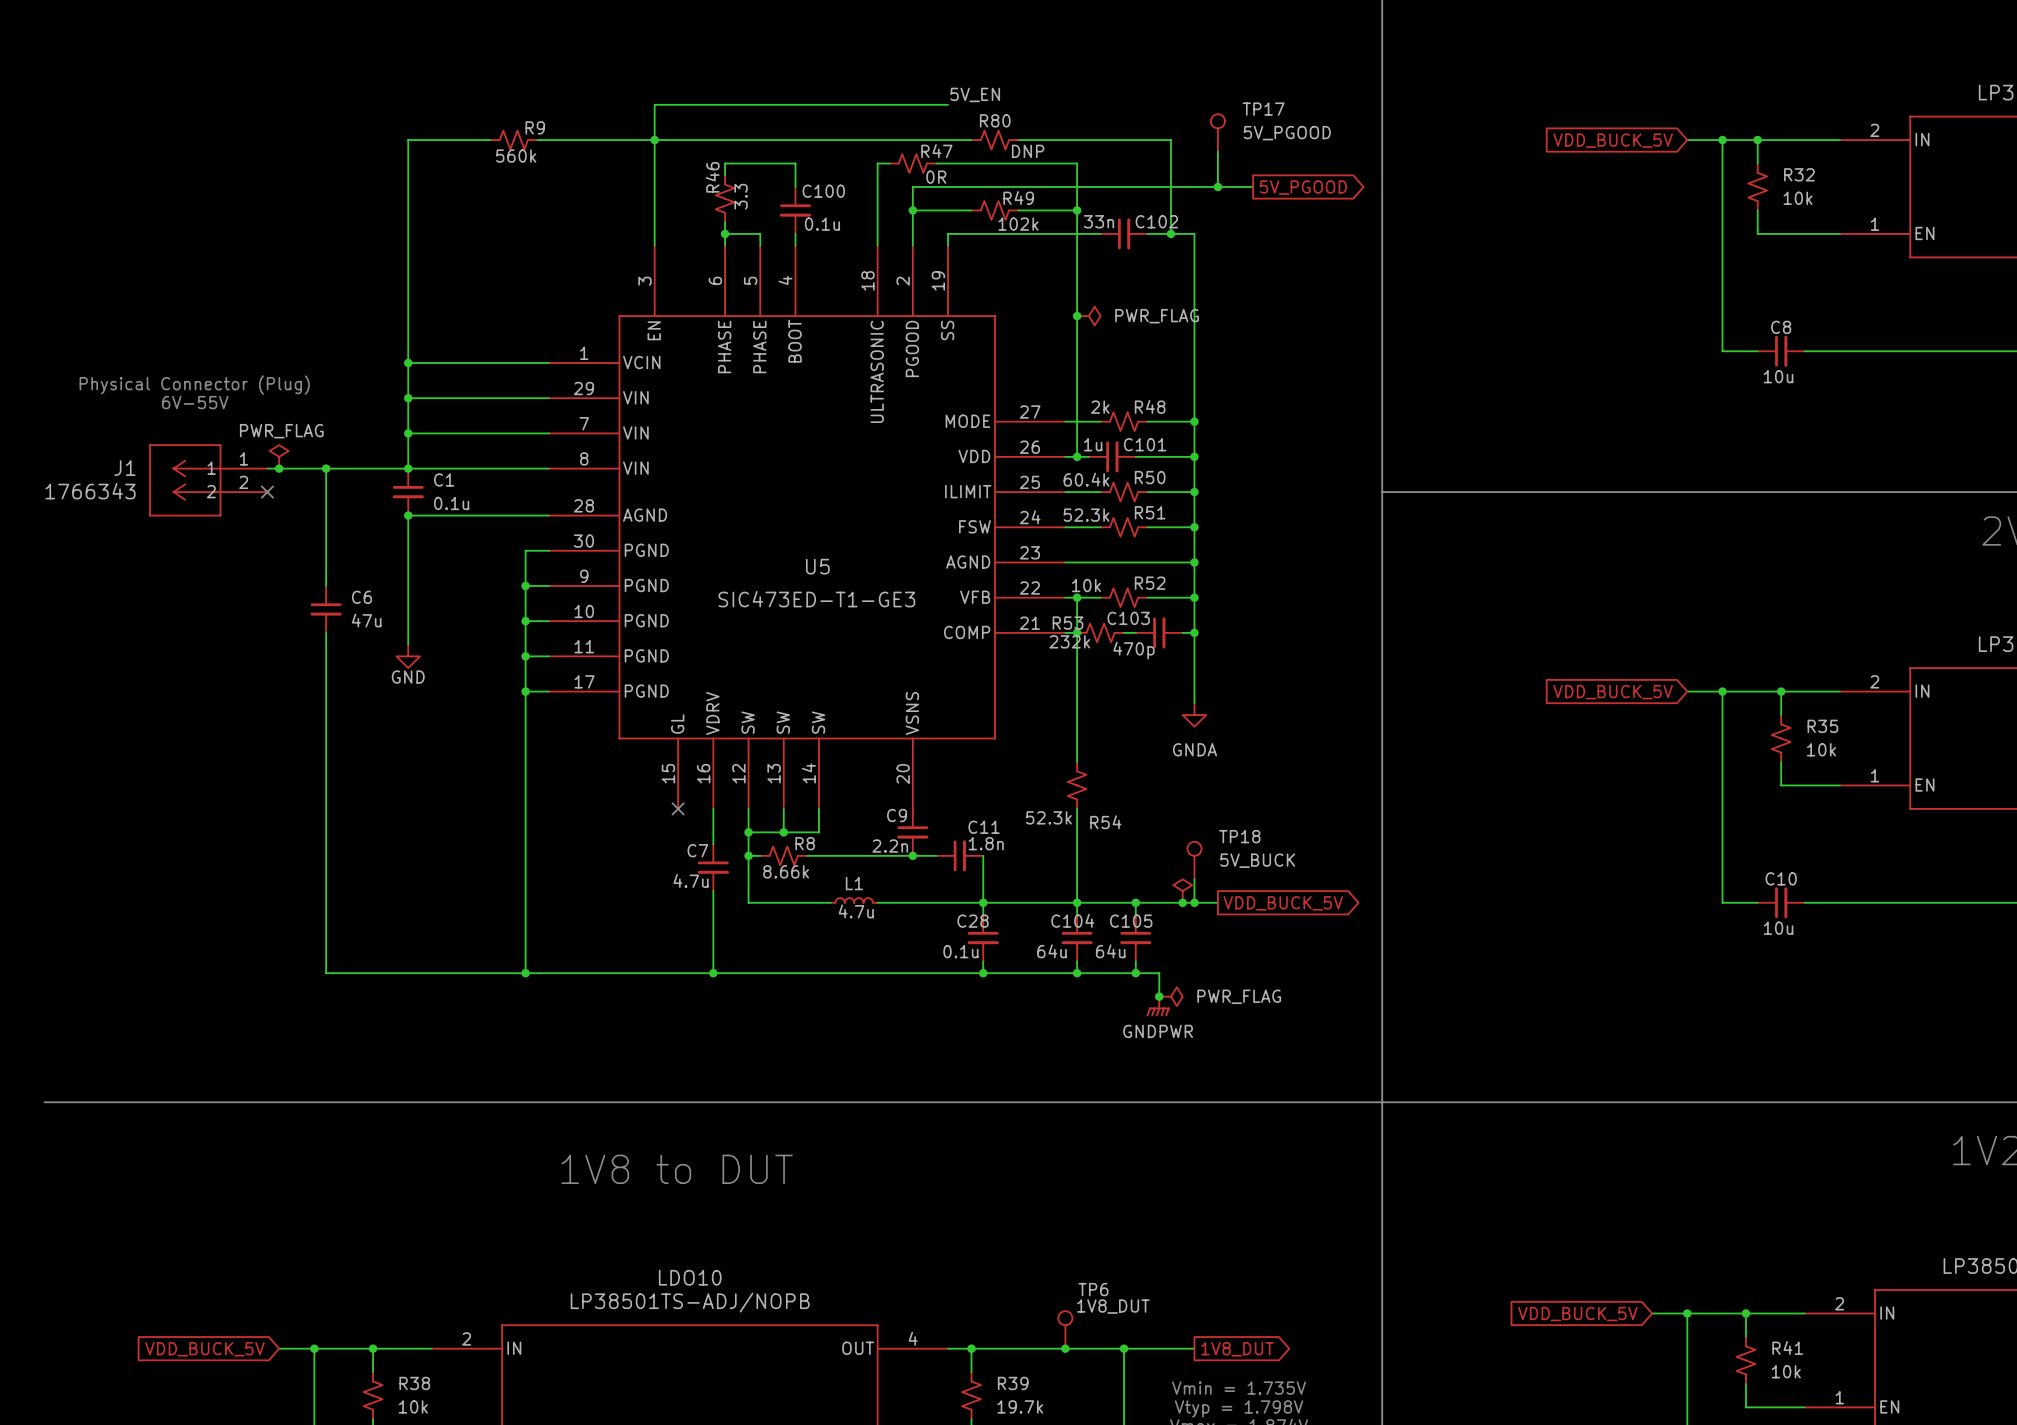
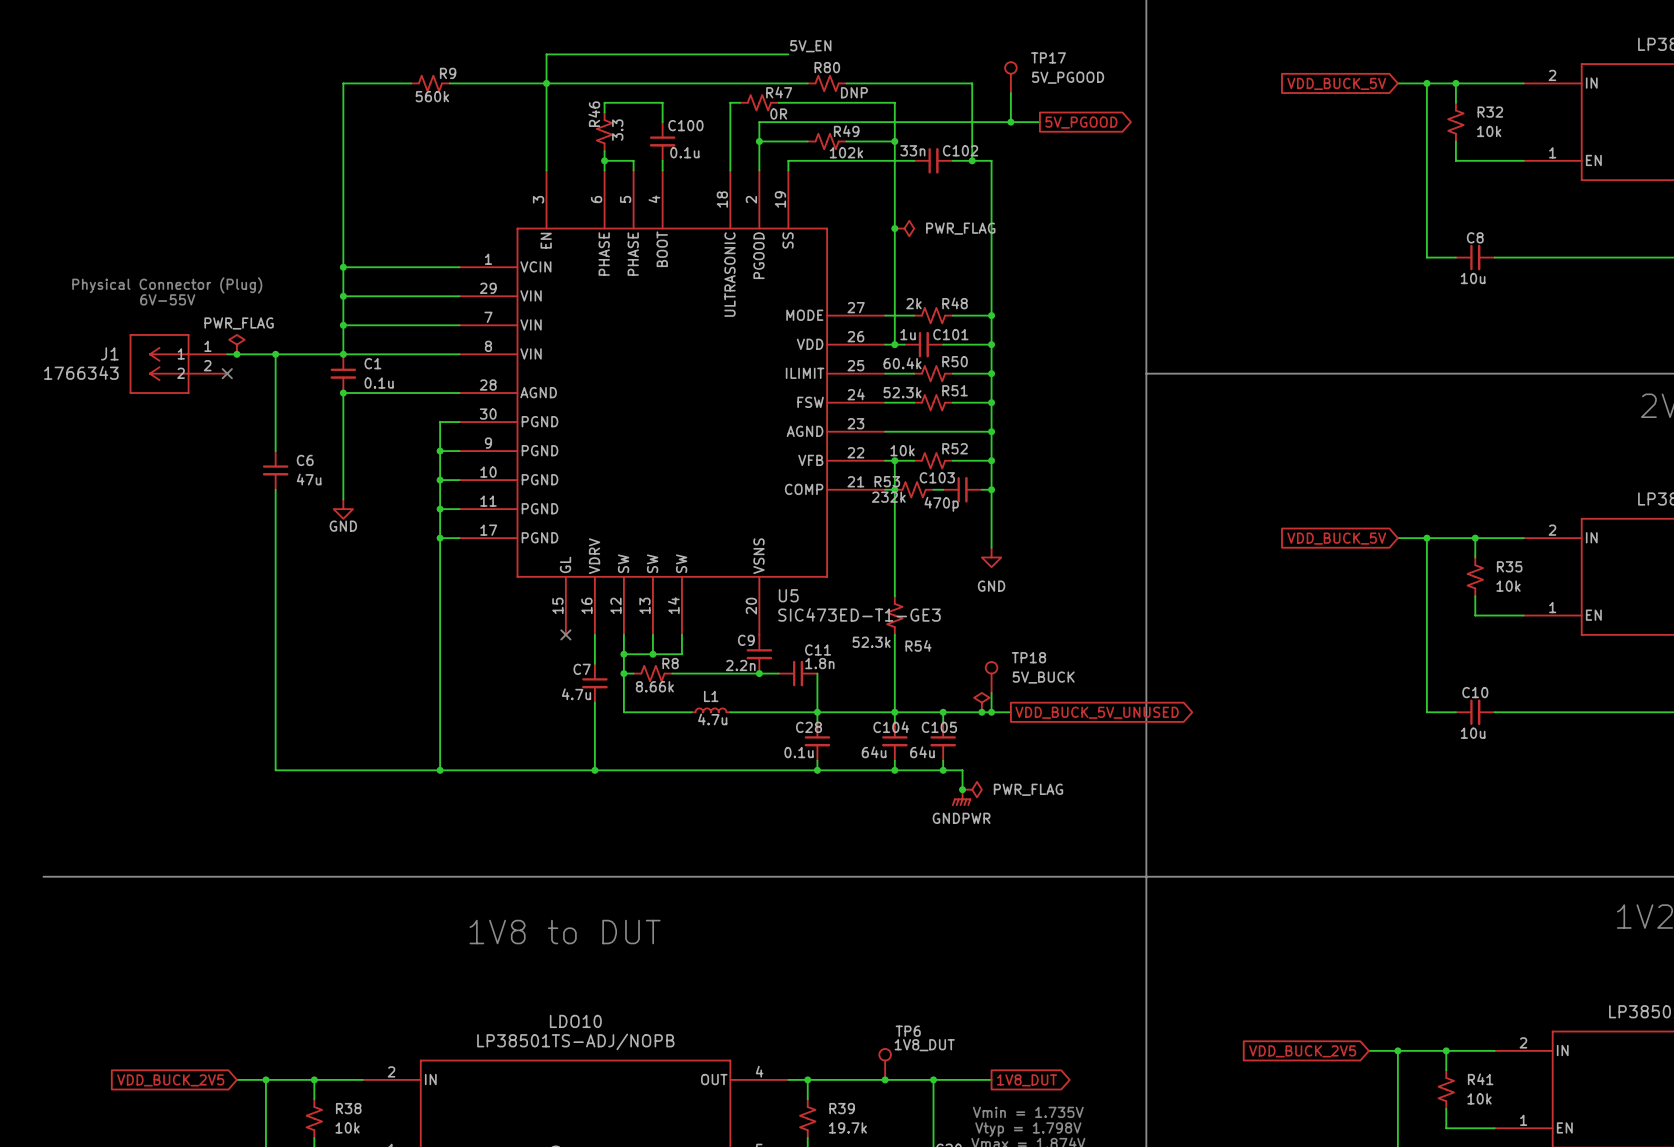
U5 name position: U5 (817, 566) -> U5 (788, 595)
U5 value position: SIC473ED-T1-GE3 (816, 599) -> SIC473ED-T1-GE3 (859, 614)
power symbol: GNDA (1194, 715) -> GND (991, 557)
global label: VDD_BUCK_5V (1283, 903) -> VDD_BUCK_5V_UNUSED (1097, 712)
global label: VDD_BUCK_5V (1577, 1314) -> VDD_BUCK_2V5 (1302, 1051)
global label: VDD_BUCK_5V (204, 1349) -> VDD_BUCK_2V5 (170, 1080)

